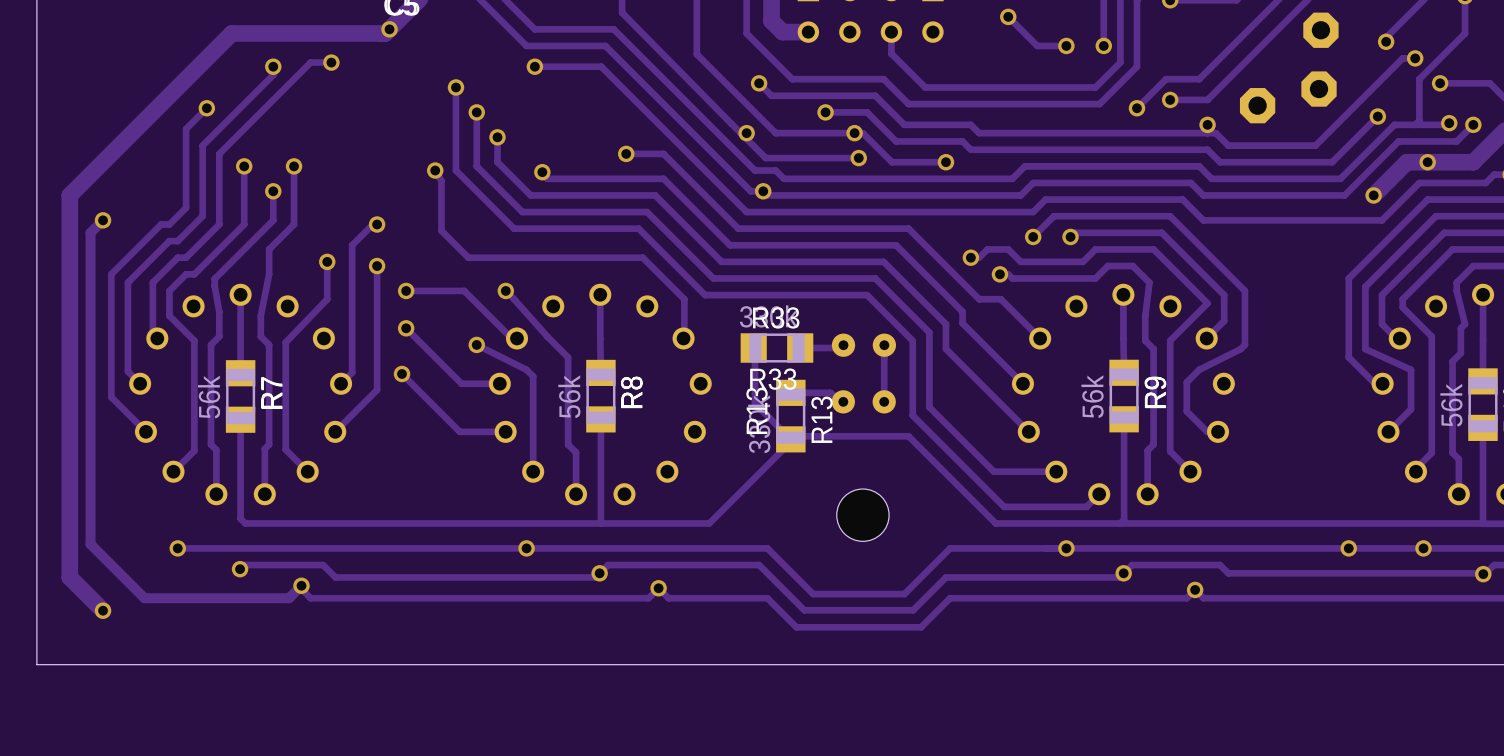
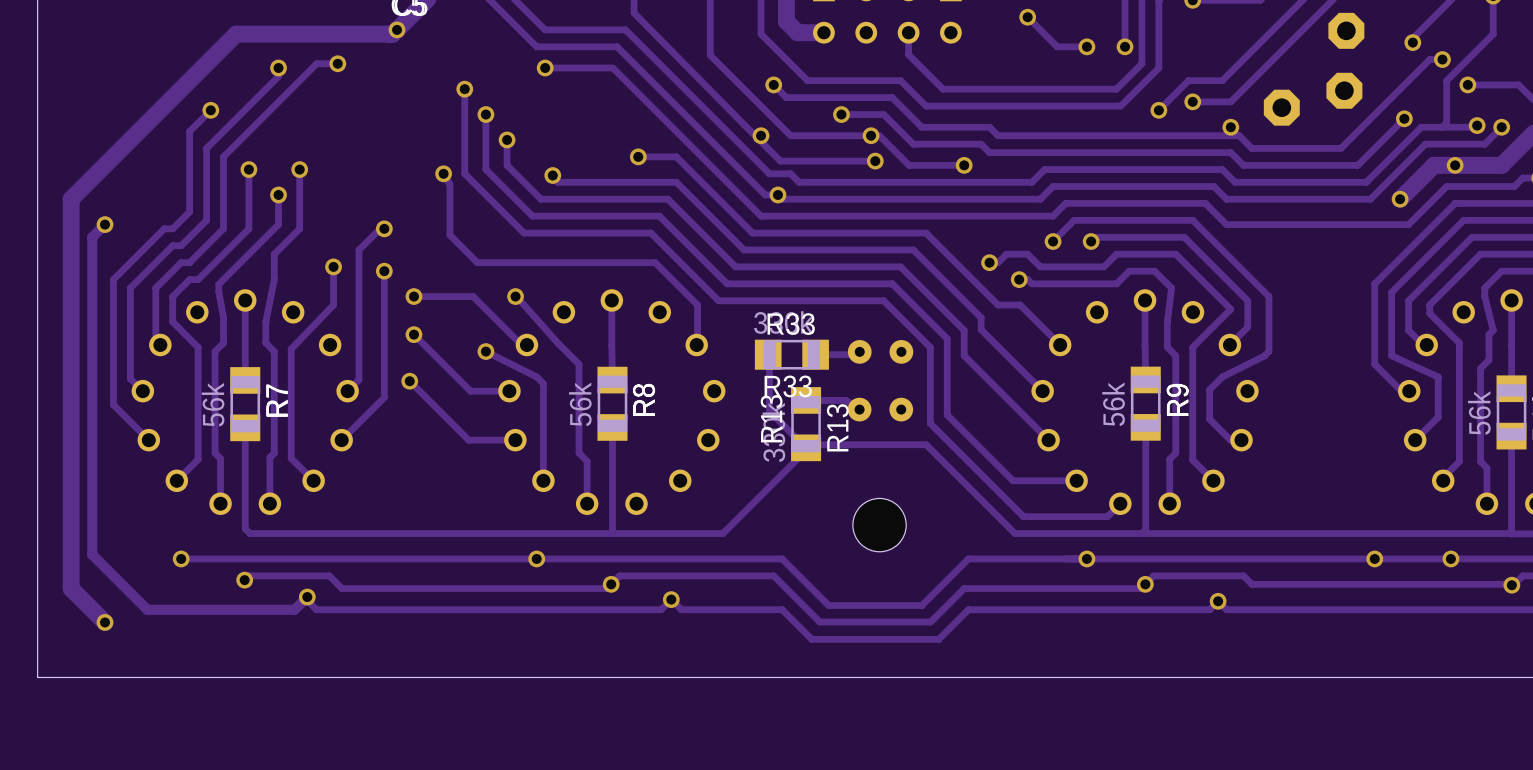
track: (884, 345) (884, 401) -> none

